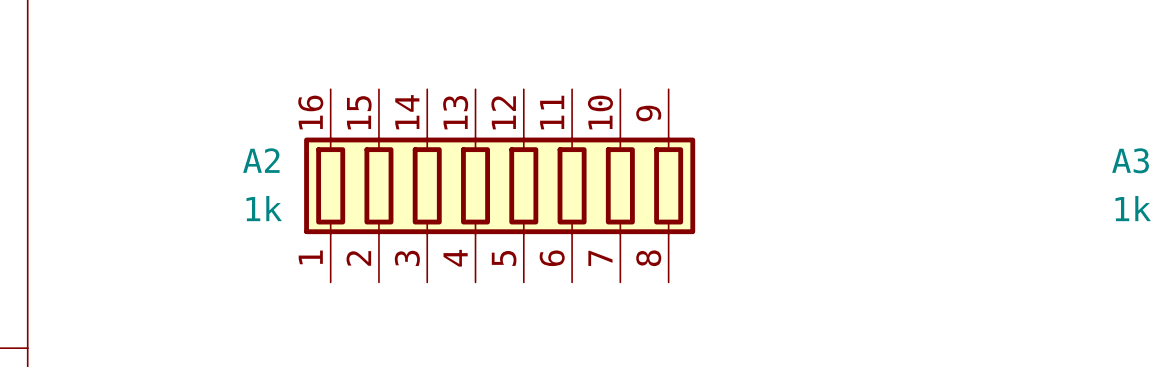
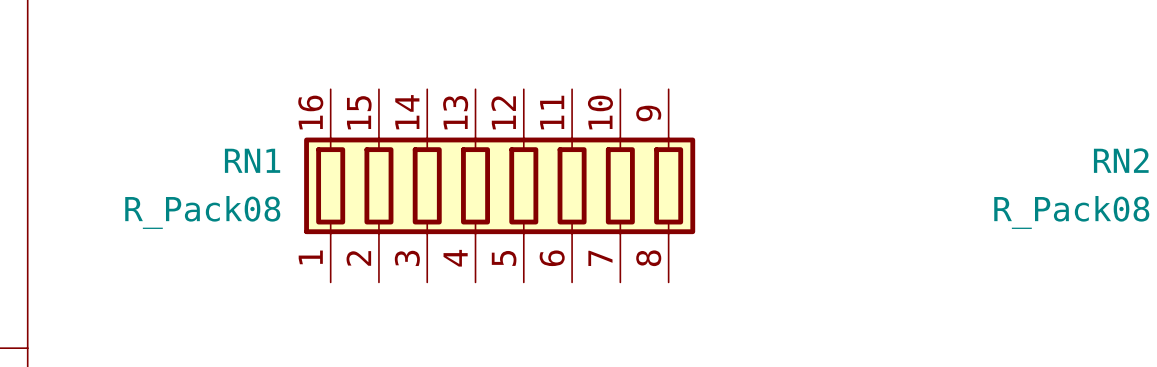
A2 name: A2 (261, 160) -> RN1 (252, 160)
A3 name: A3 (1130, 160) -> RN2 (1121, 160)
A2 value: 1k (264, 208) -> R_Pack08 (202, 212)
A3 value: 1k (1133, 208) -> R_Pack08 (1071, 212)

